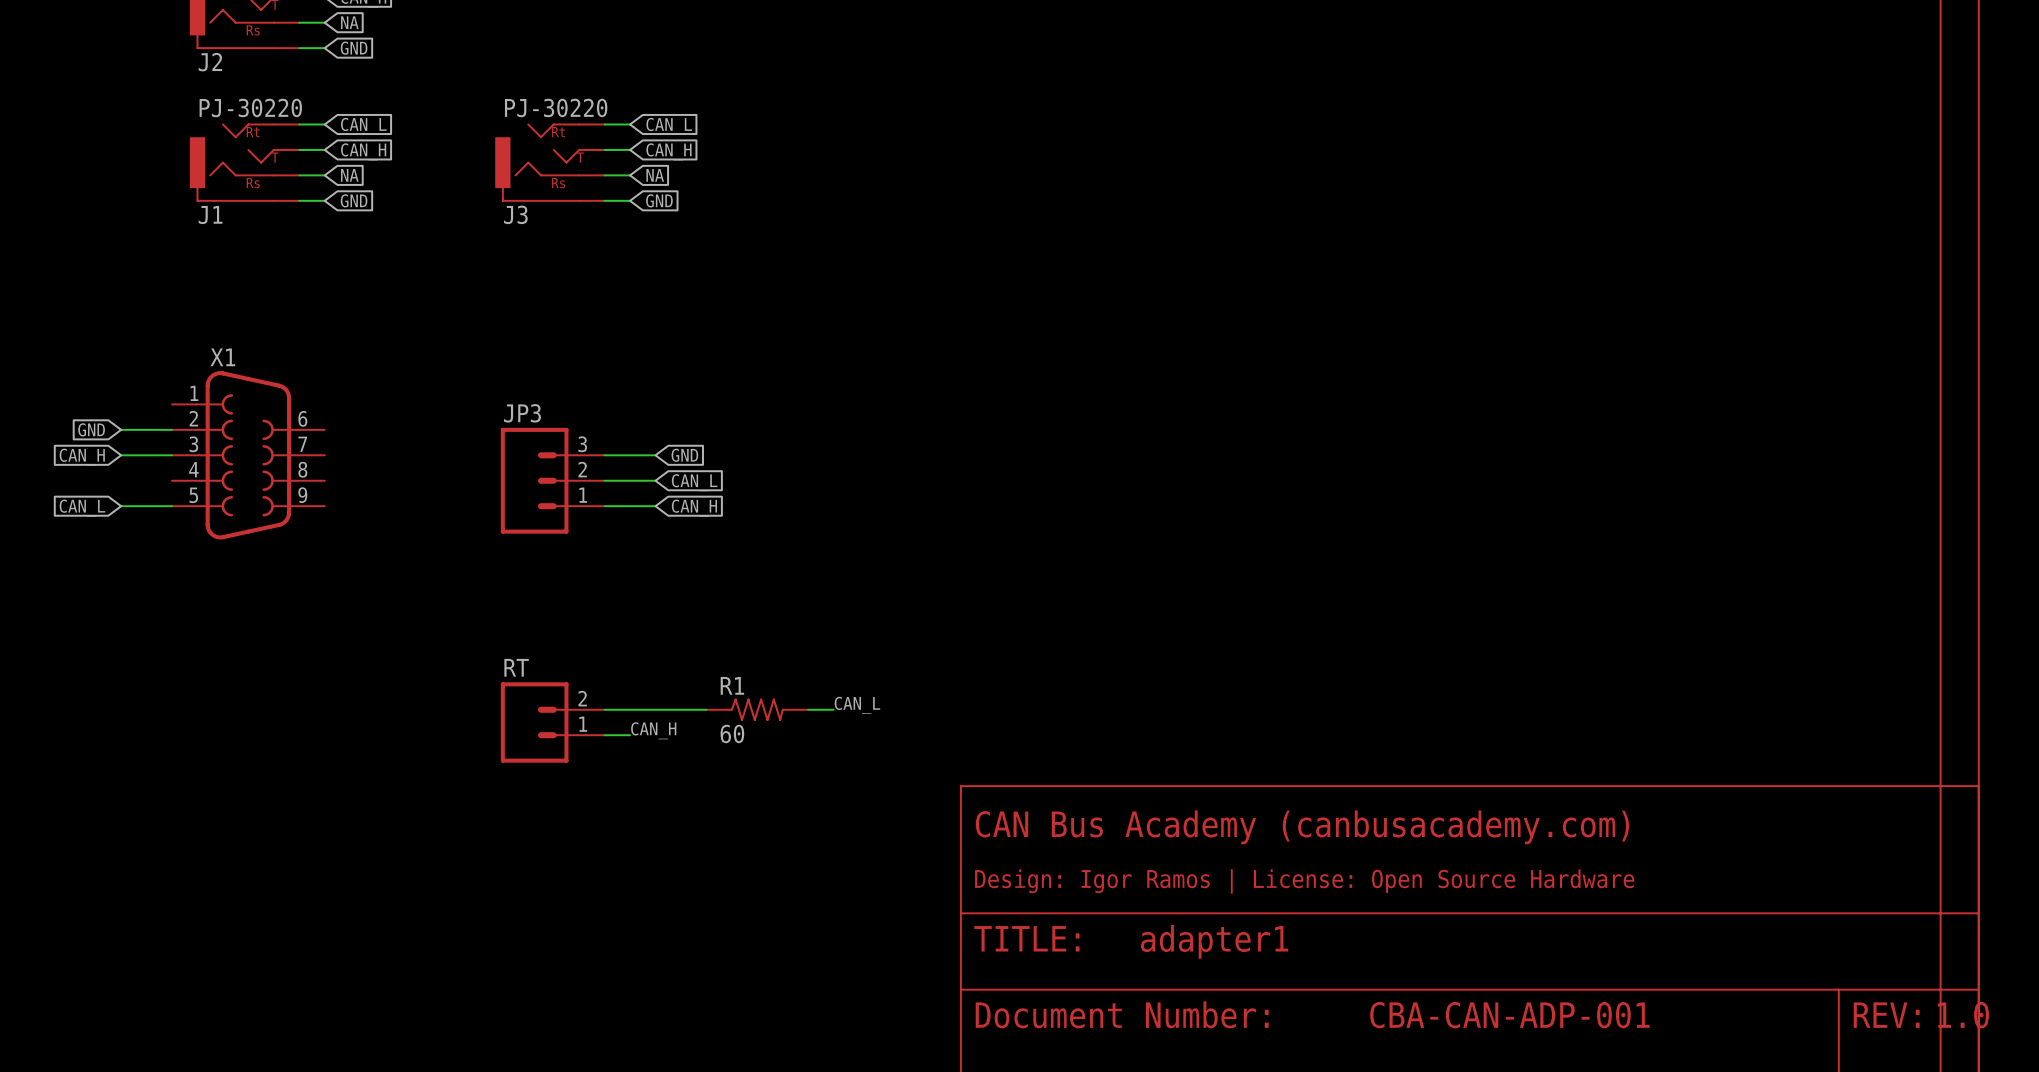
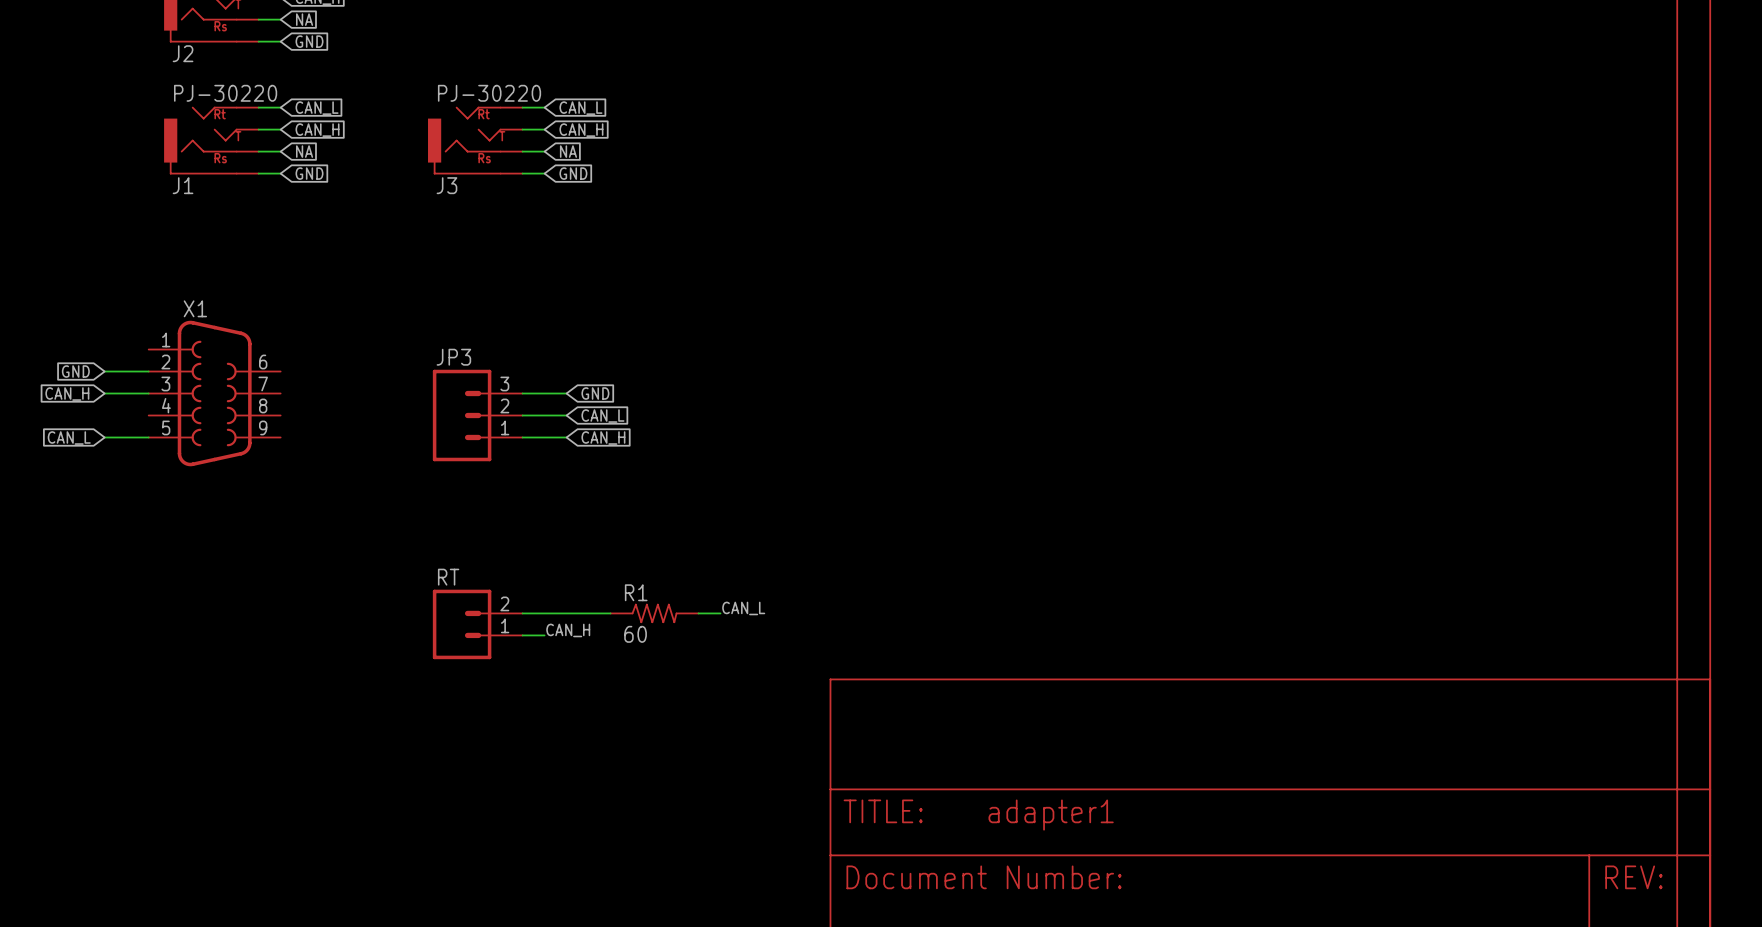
text: CAN Bus Academy (canbusacademy.com) (1302, 827) -> none
text: Design: Igor Ramos | License: Open Source Hardware (1304, 881) -> none
text: CBA-CAN-ADP-001 (1509, 1015) -> none
text: 1.0 (1963, 1015) -> none

